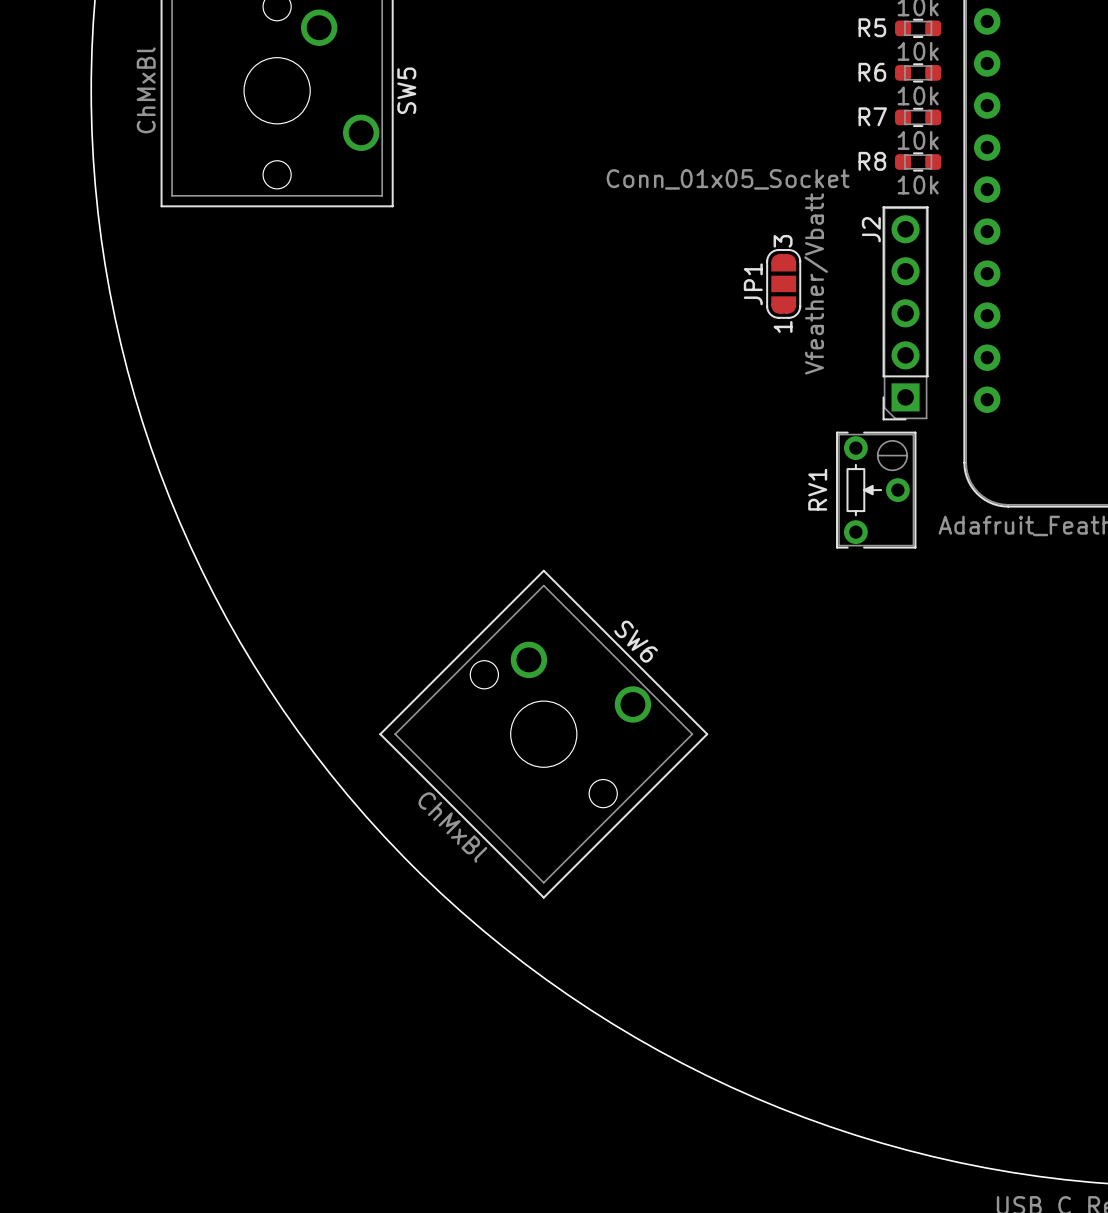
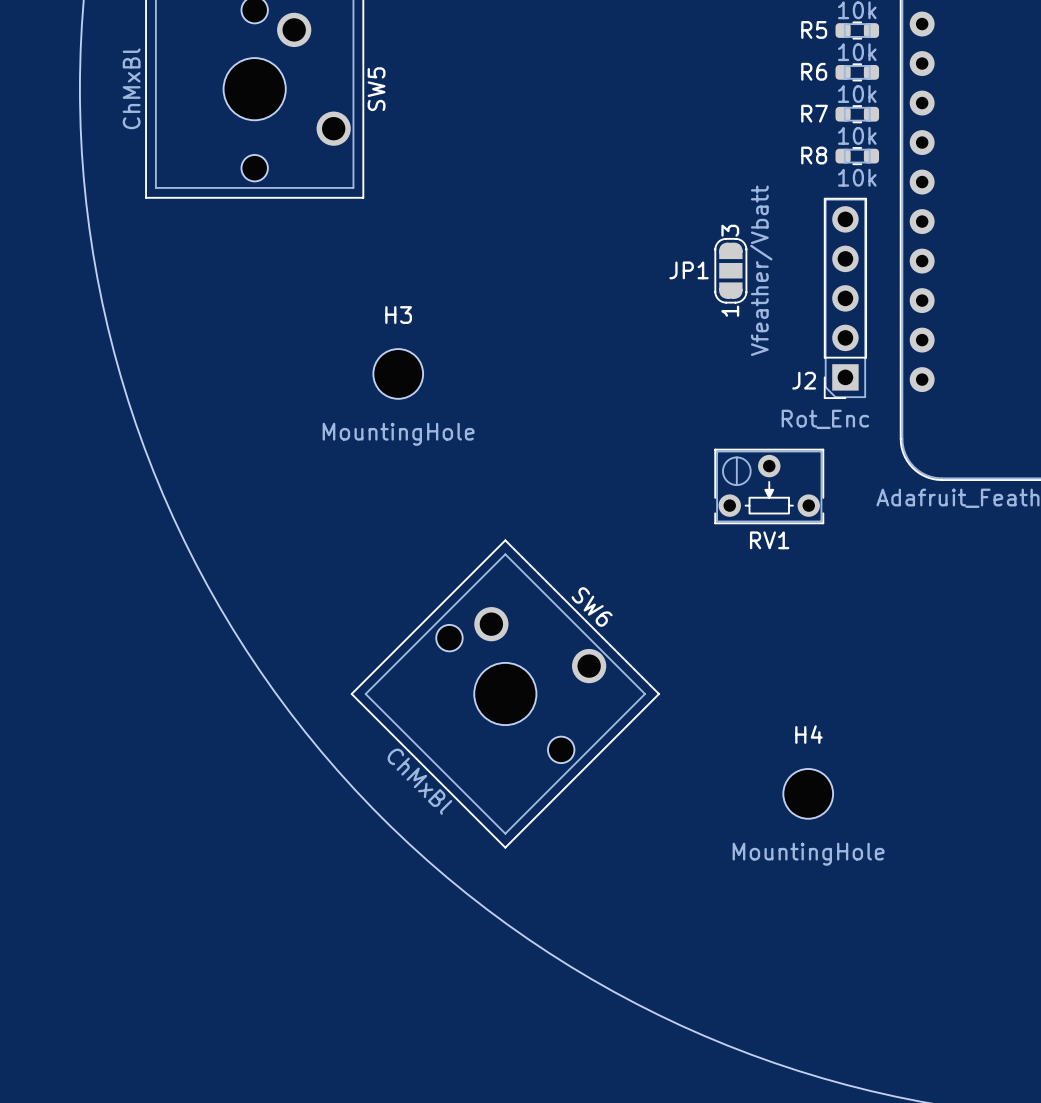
J2 value: Conn_01x05_Socket (728, 179) -> Rot_Enc (825, 419)
J2 name rotation: 0° (871, 229) -> 90° clockwise (804, 380)
J2 name position: J2 (871, 229) -> J2 (804, 380)
JP1 name rotation: 0° (753, 284) -> 90° clockwise (689, 270)
H3: none -> MountingHole (398, 373)
RV1 rotation: 0° (876, 490) -> 90° counterclockwise (769, 486)
H4: none -> MountingHole (808, 793)

